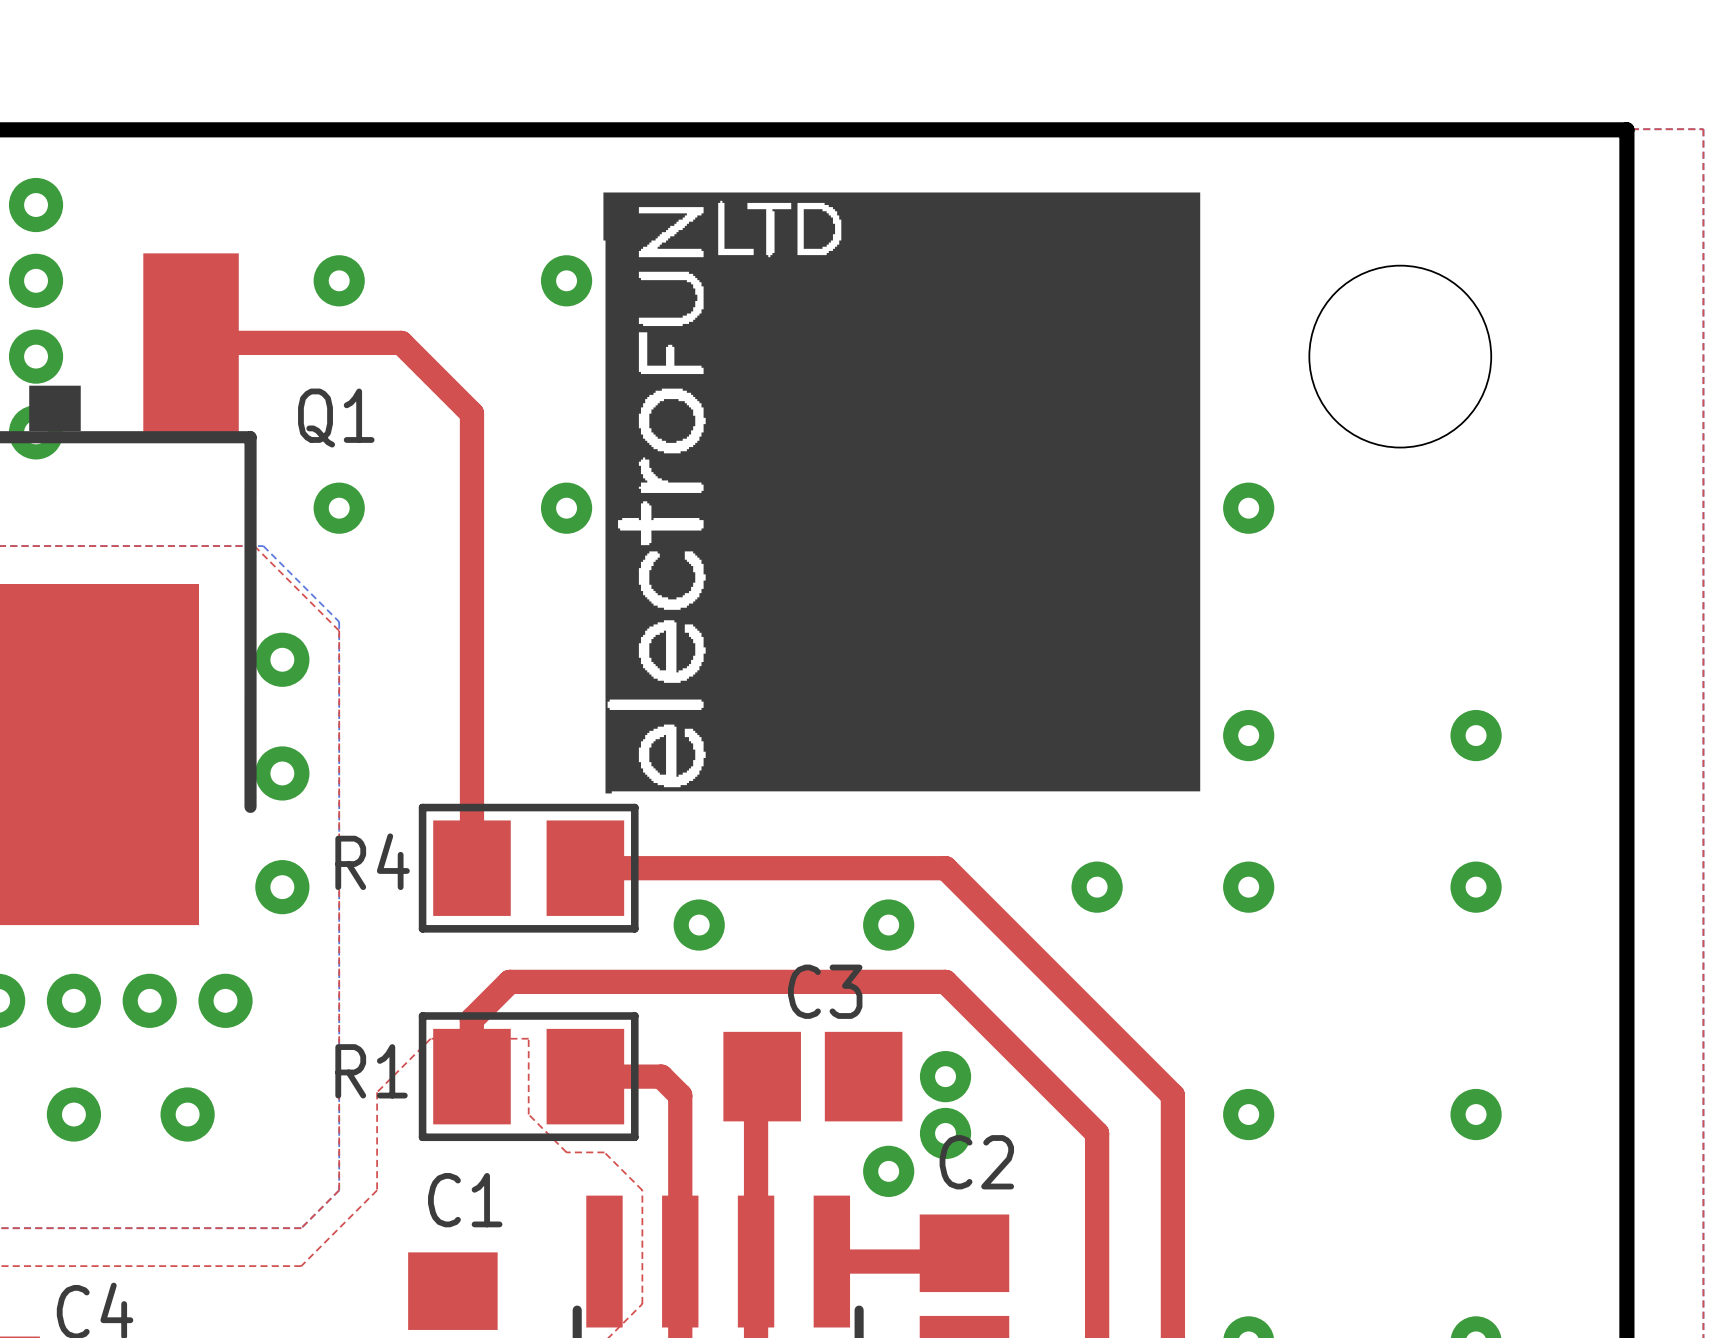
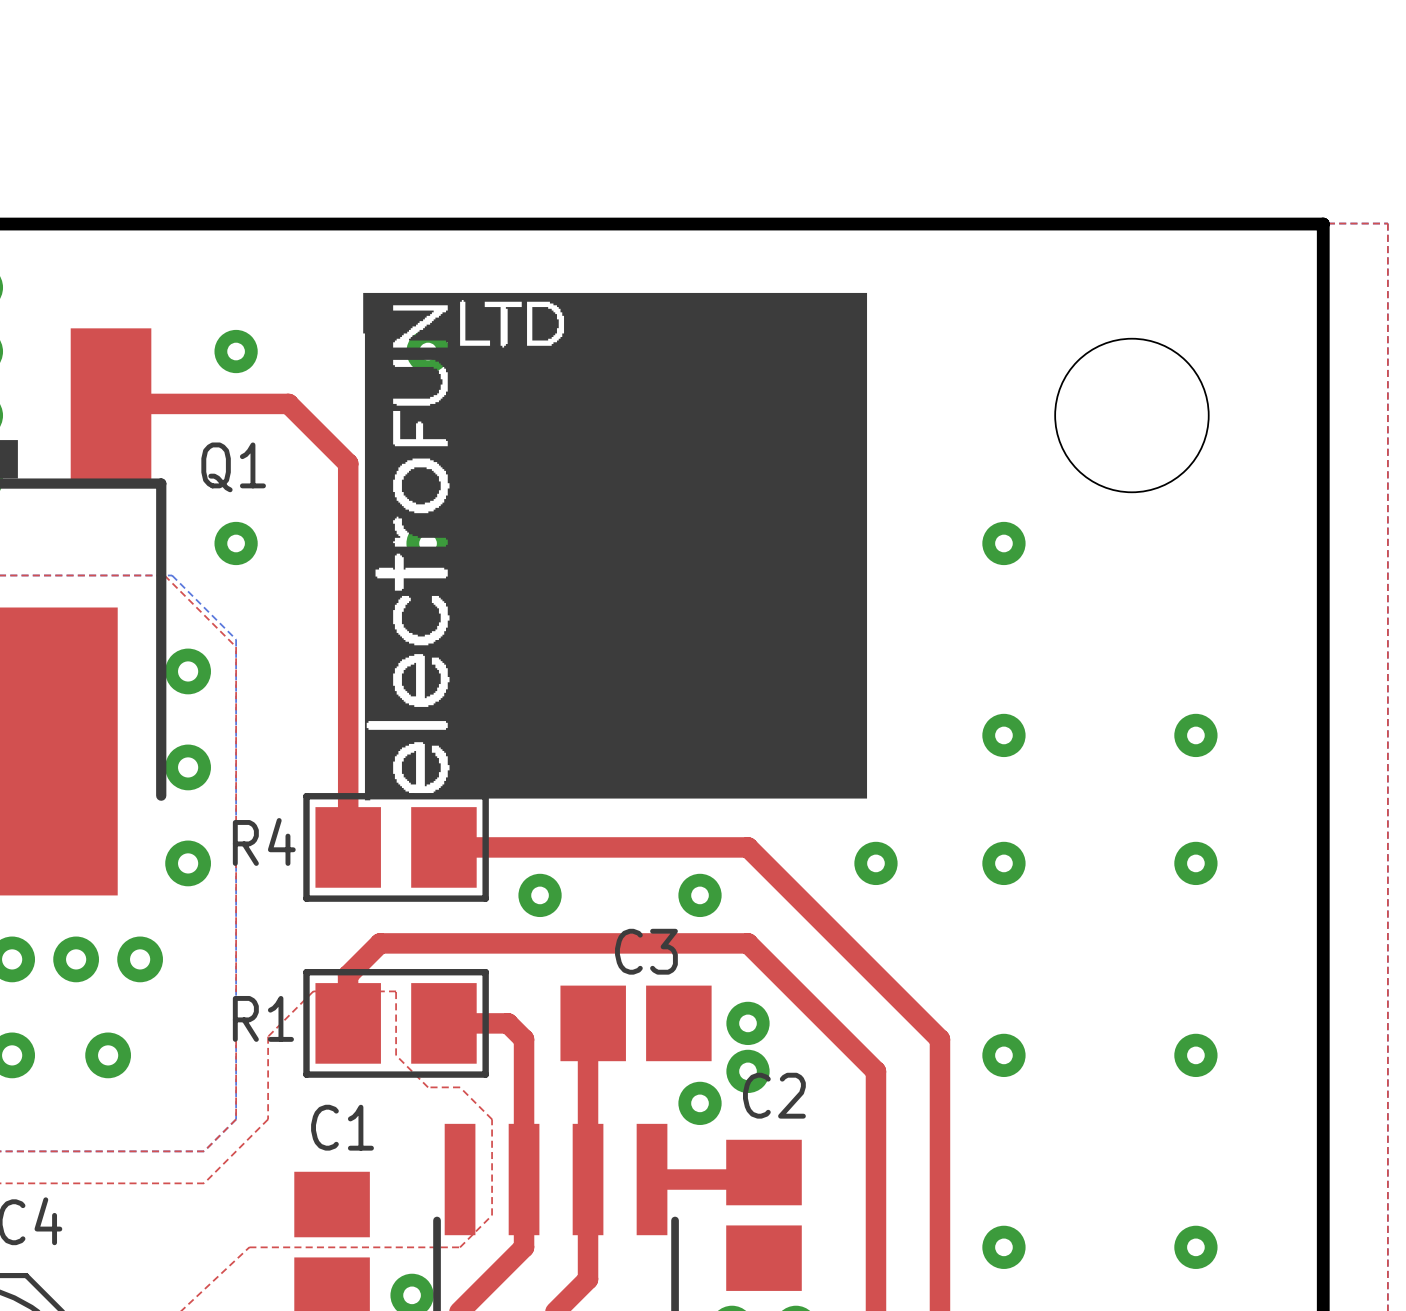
drawing position: (901, 492) -> (615, 546)

